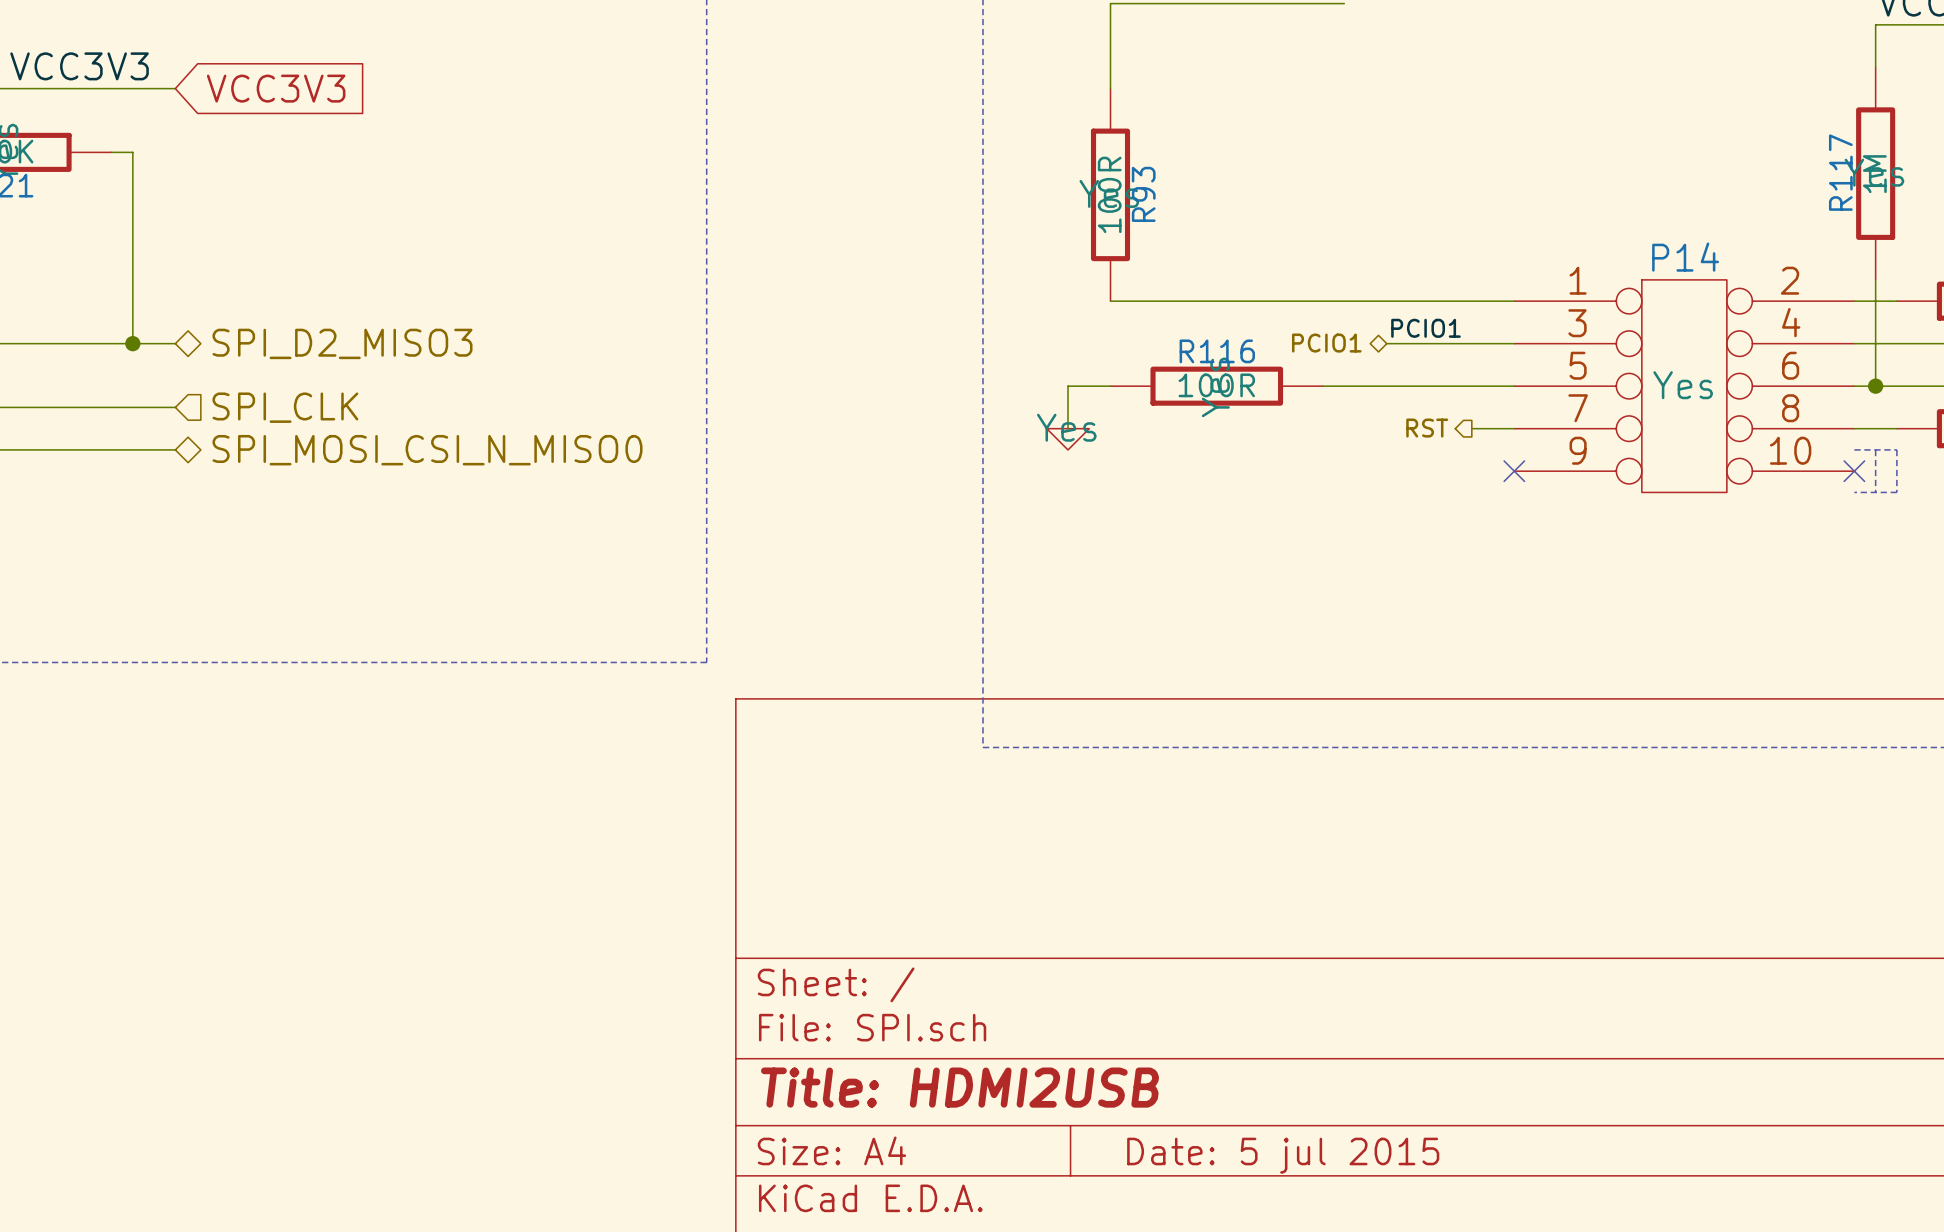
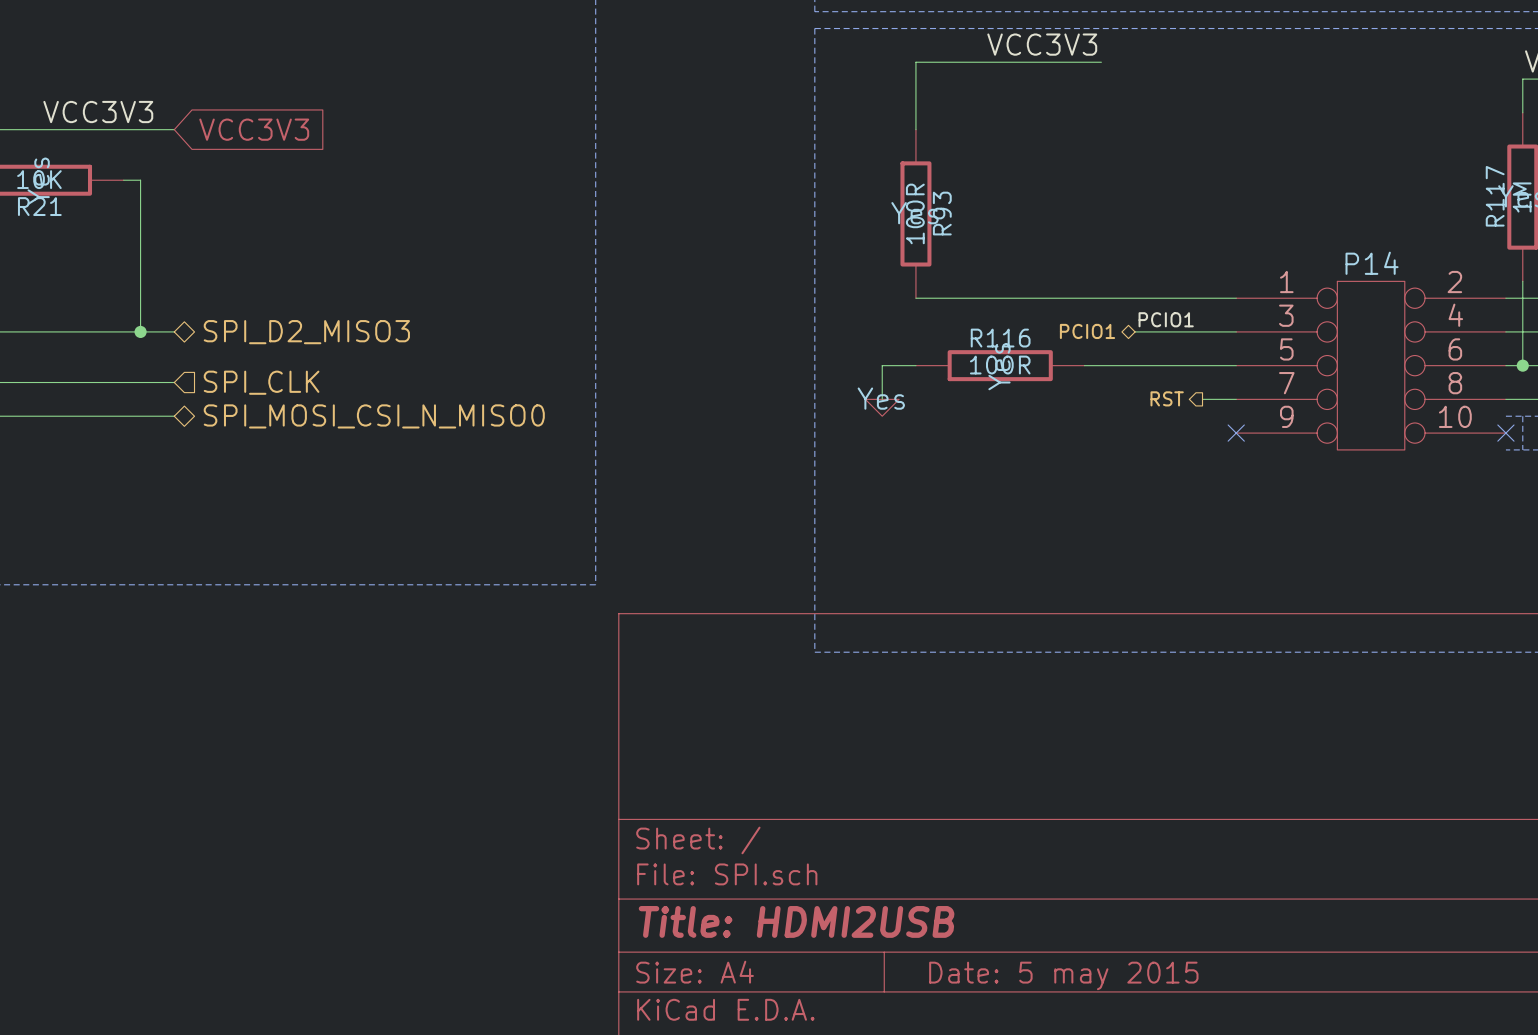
P14 text: Yes (1683, 385) -> none
title block: Date: 5 jul 2015 (1283, 1155) -> Date: 5 may 2015 (1063, 975)

